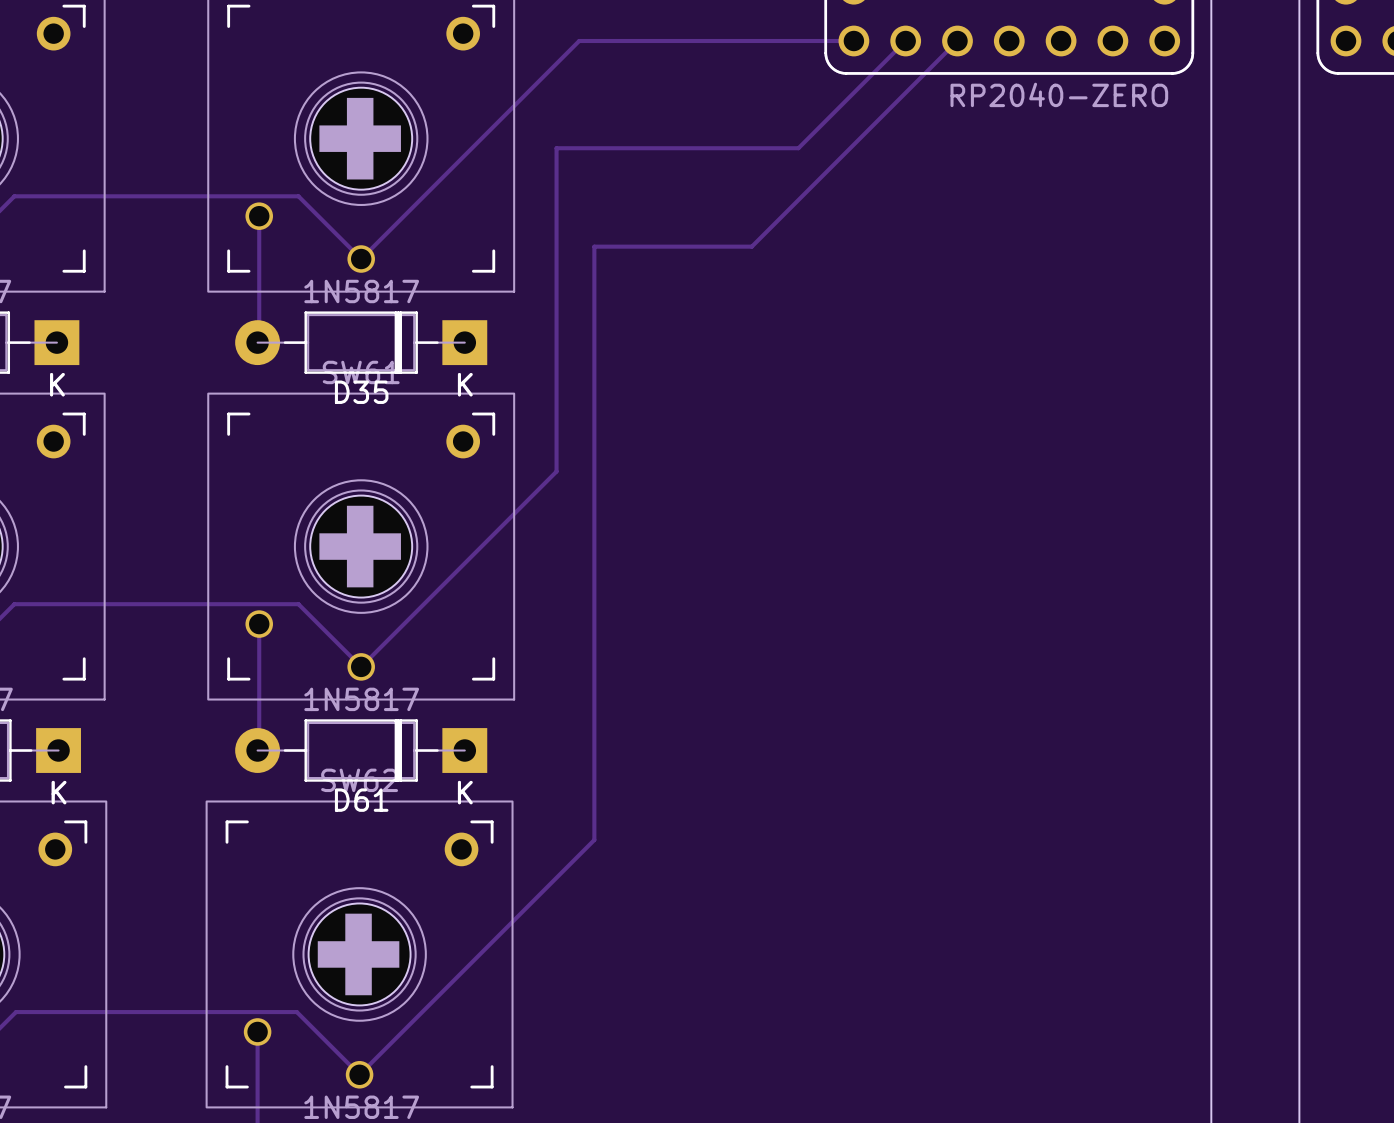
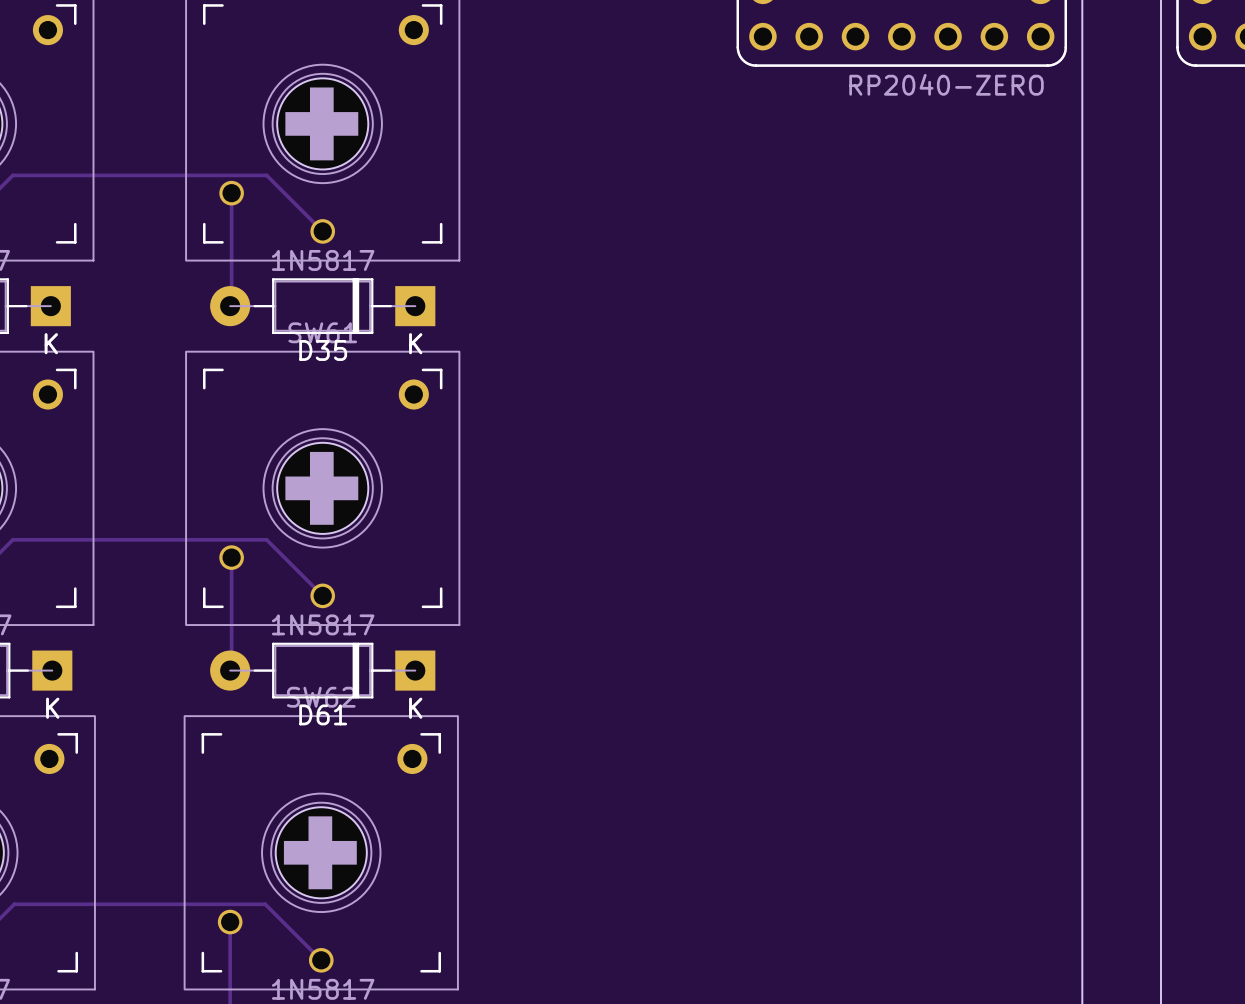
track: (853, 41) (579, 41) (361, 259) -> none
track: (905, 41) (798, 148) (556, 148) (556, 471) (361, 666) -> none
track: (957, 41) (751, 246) (594, 246) (594, 839) (359, 1074) -> none

